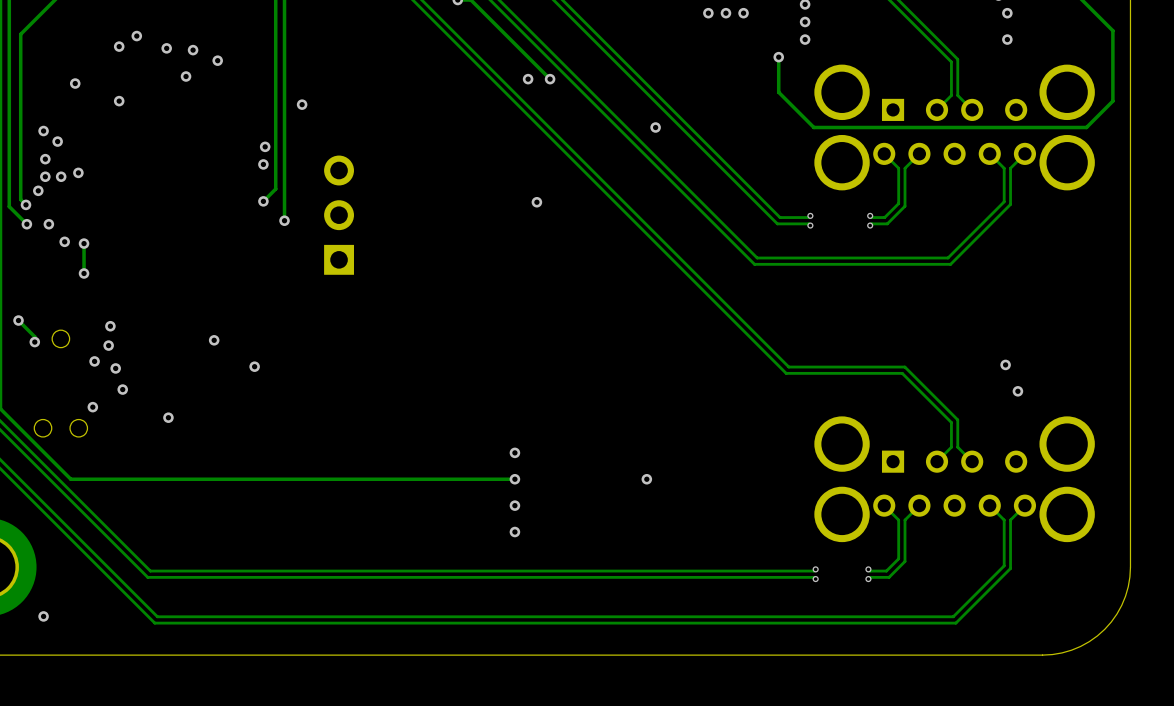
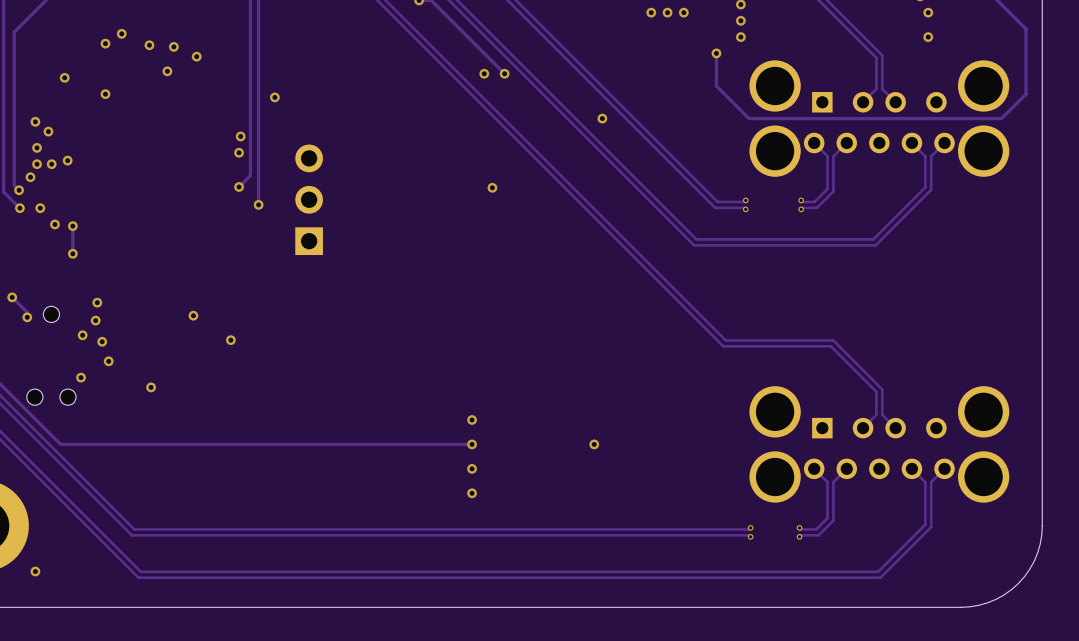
via: (1005, 364) -> none
via: (1017, 391) -> none

